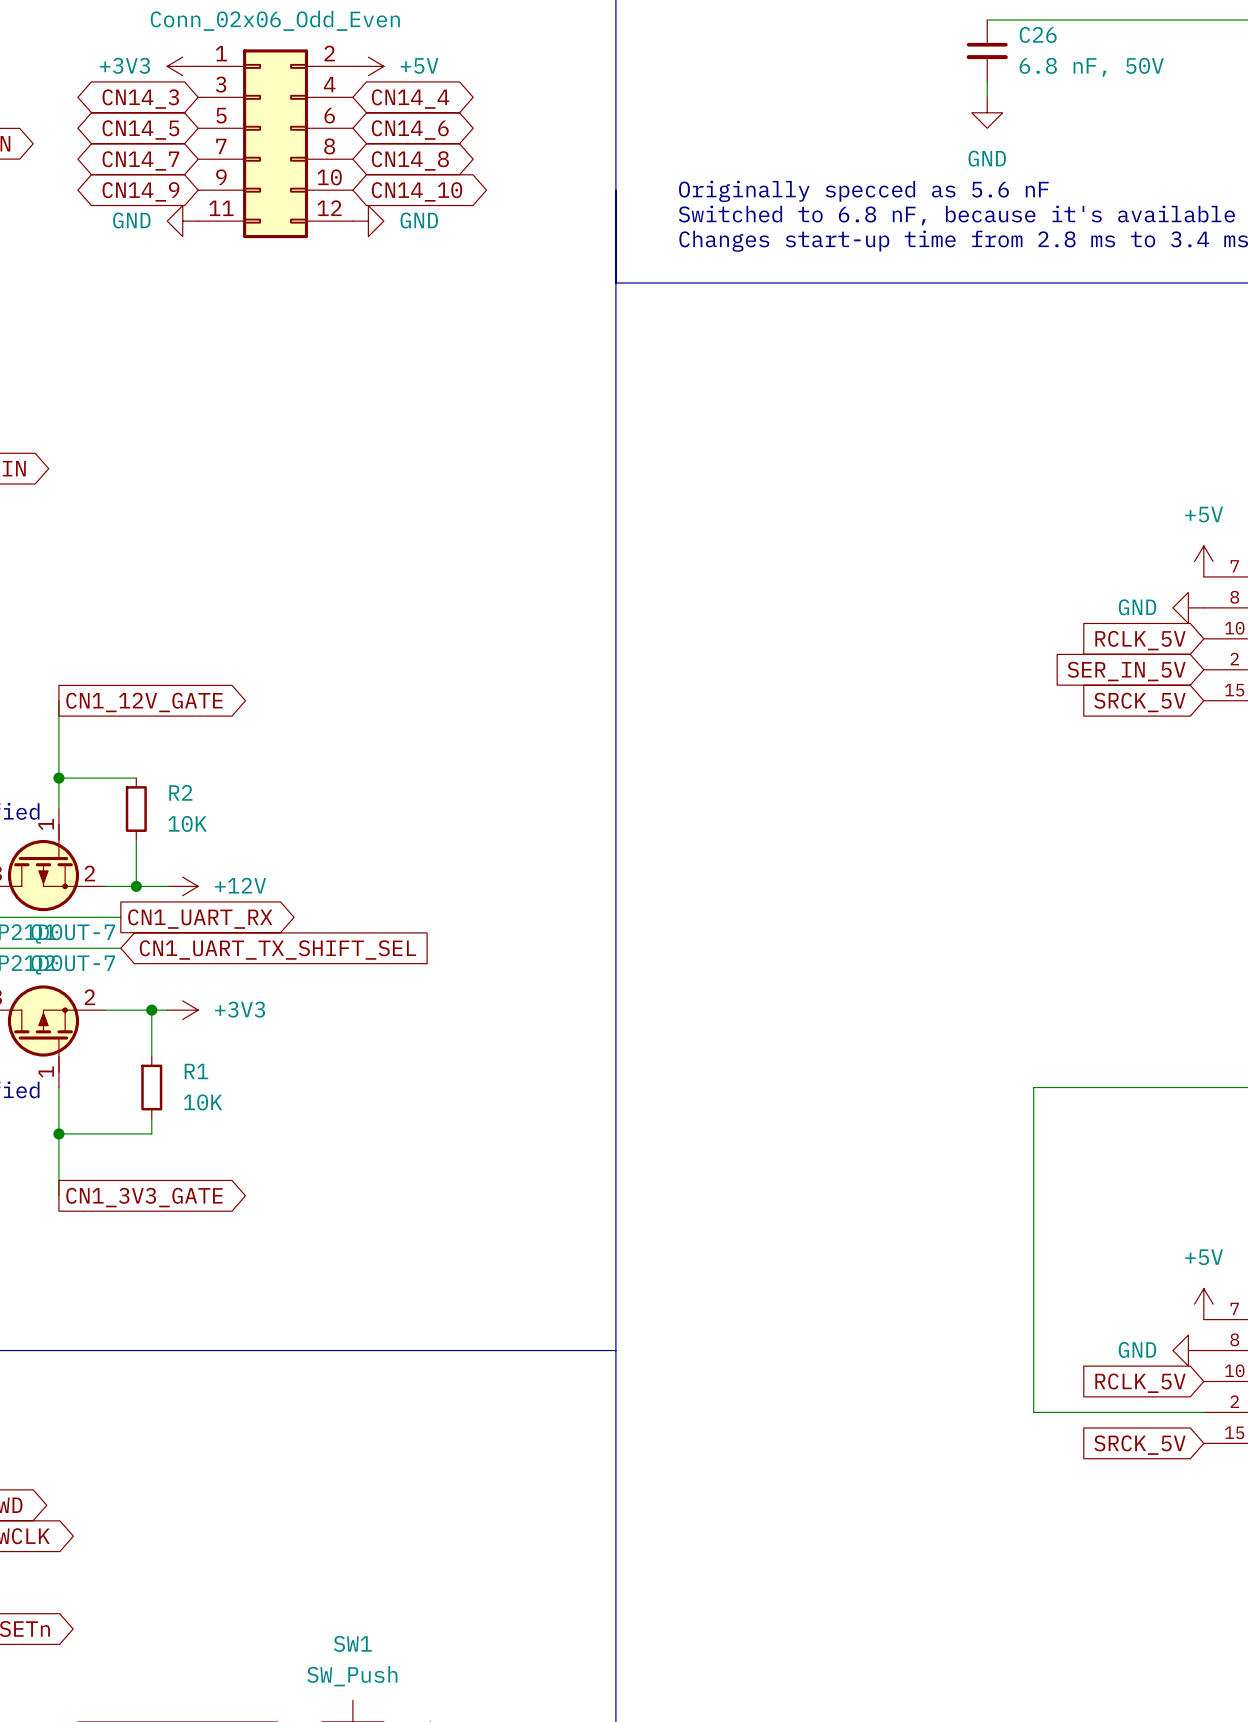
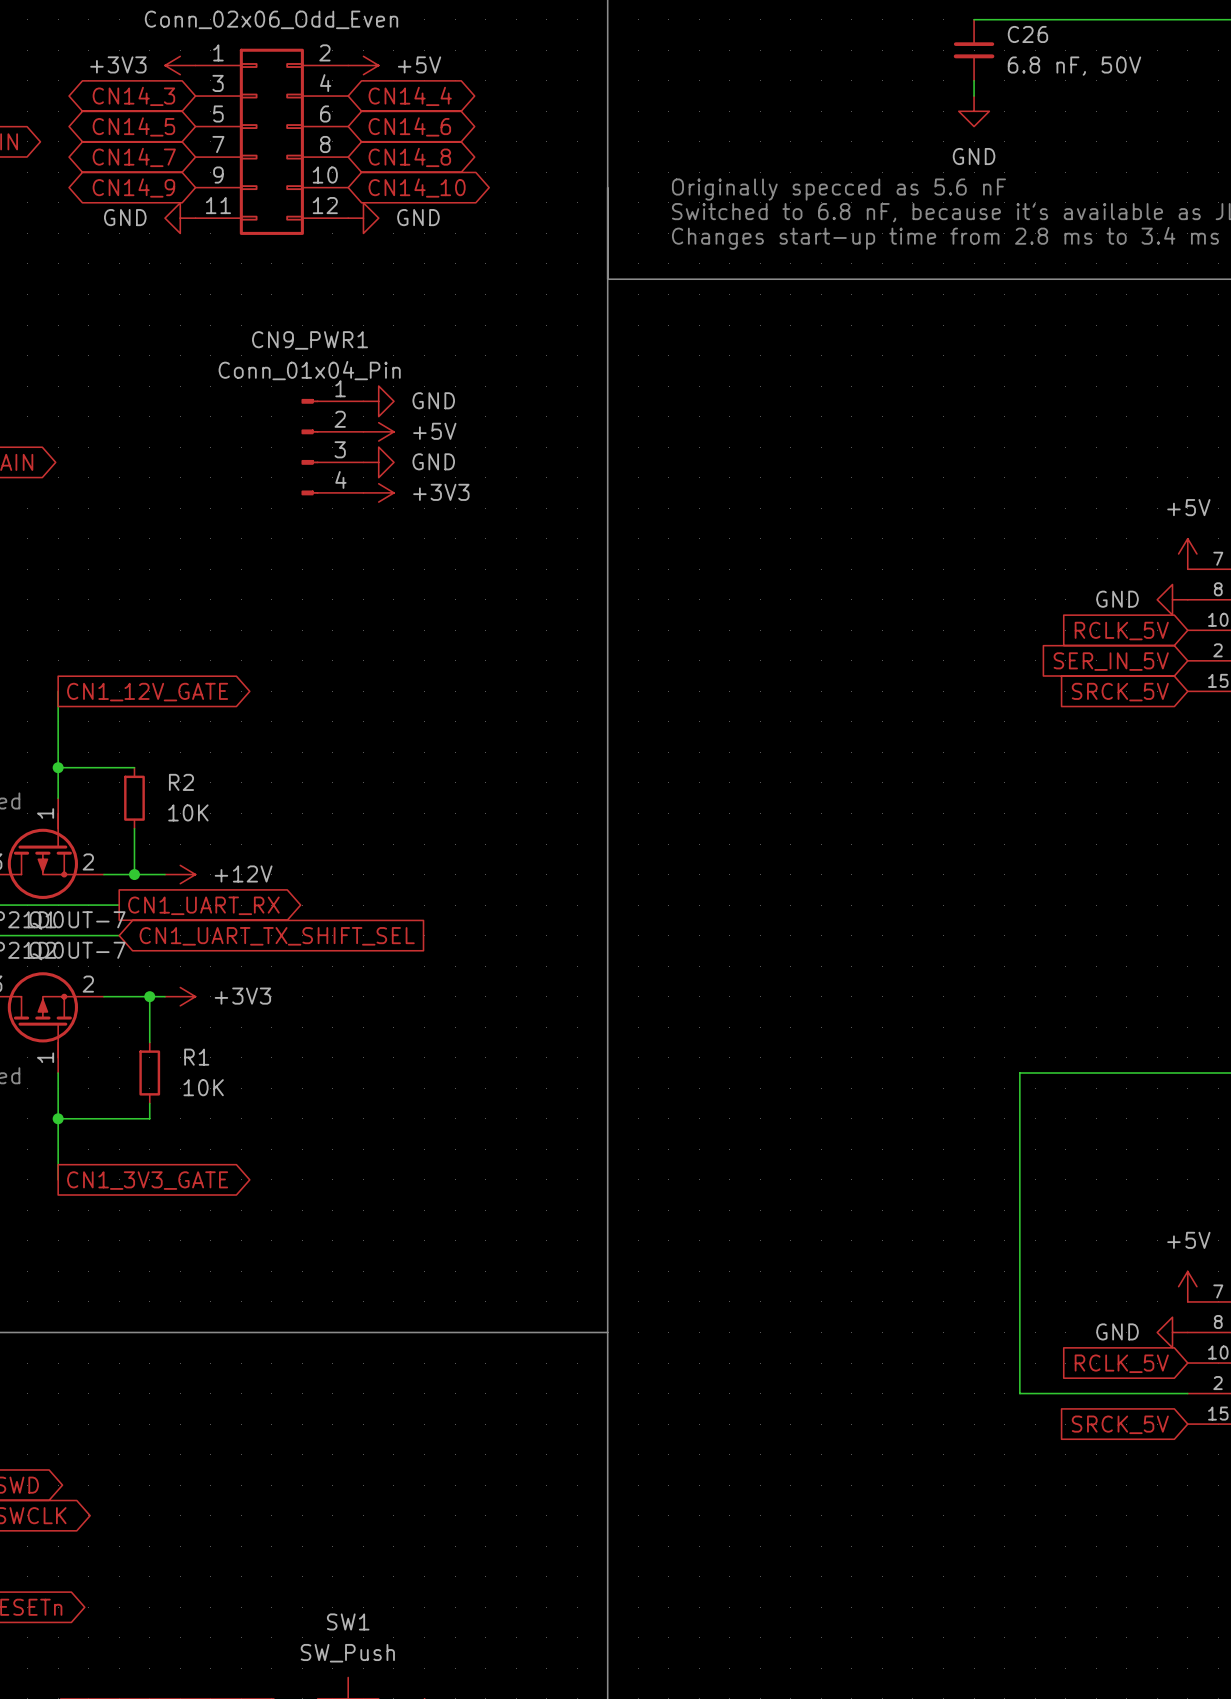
power symbol: none -> GND (378, 401)
power symbol: none -> +5V (378, 431)
CN9_PWR1: none -> Conn_01x04_Pin (332, 447)
power symbol: none -> GND (378, 462)
power symbol: none -> +3V3 (378, 492)

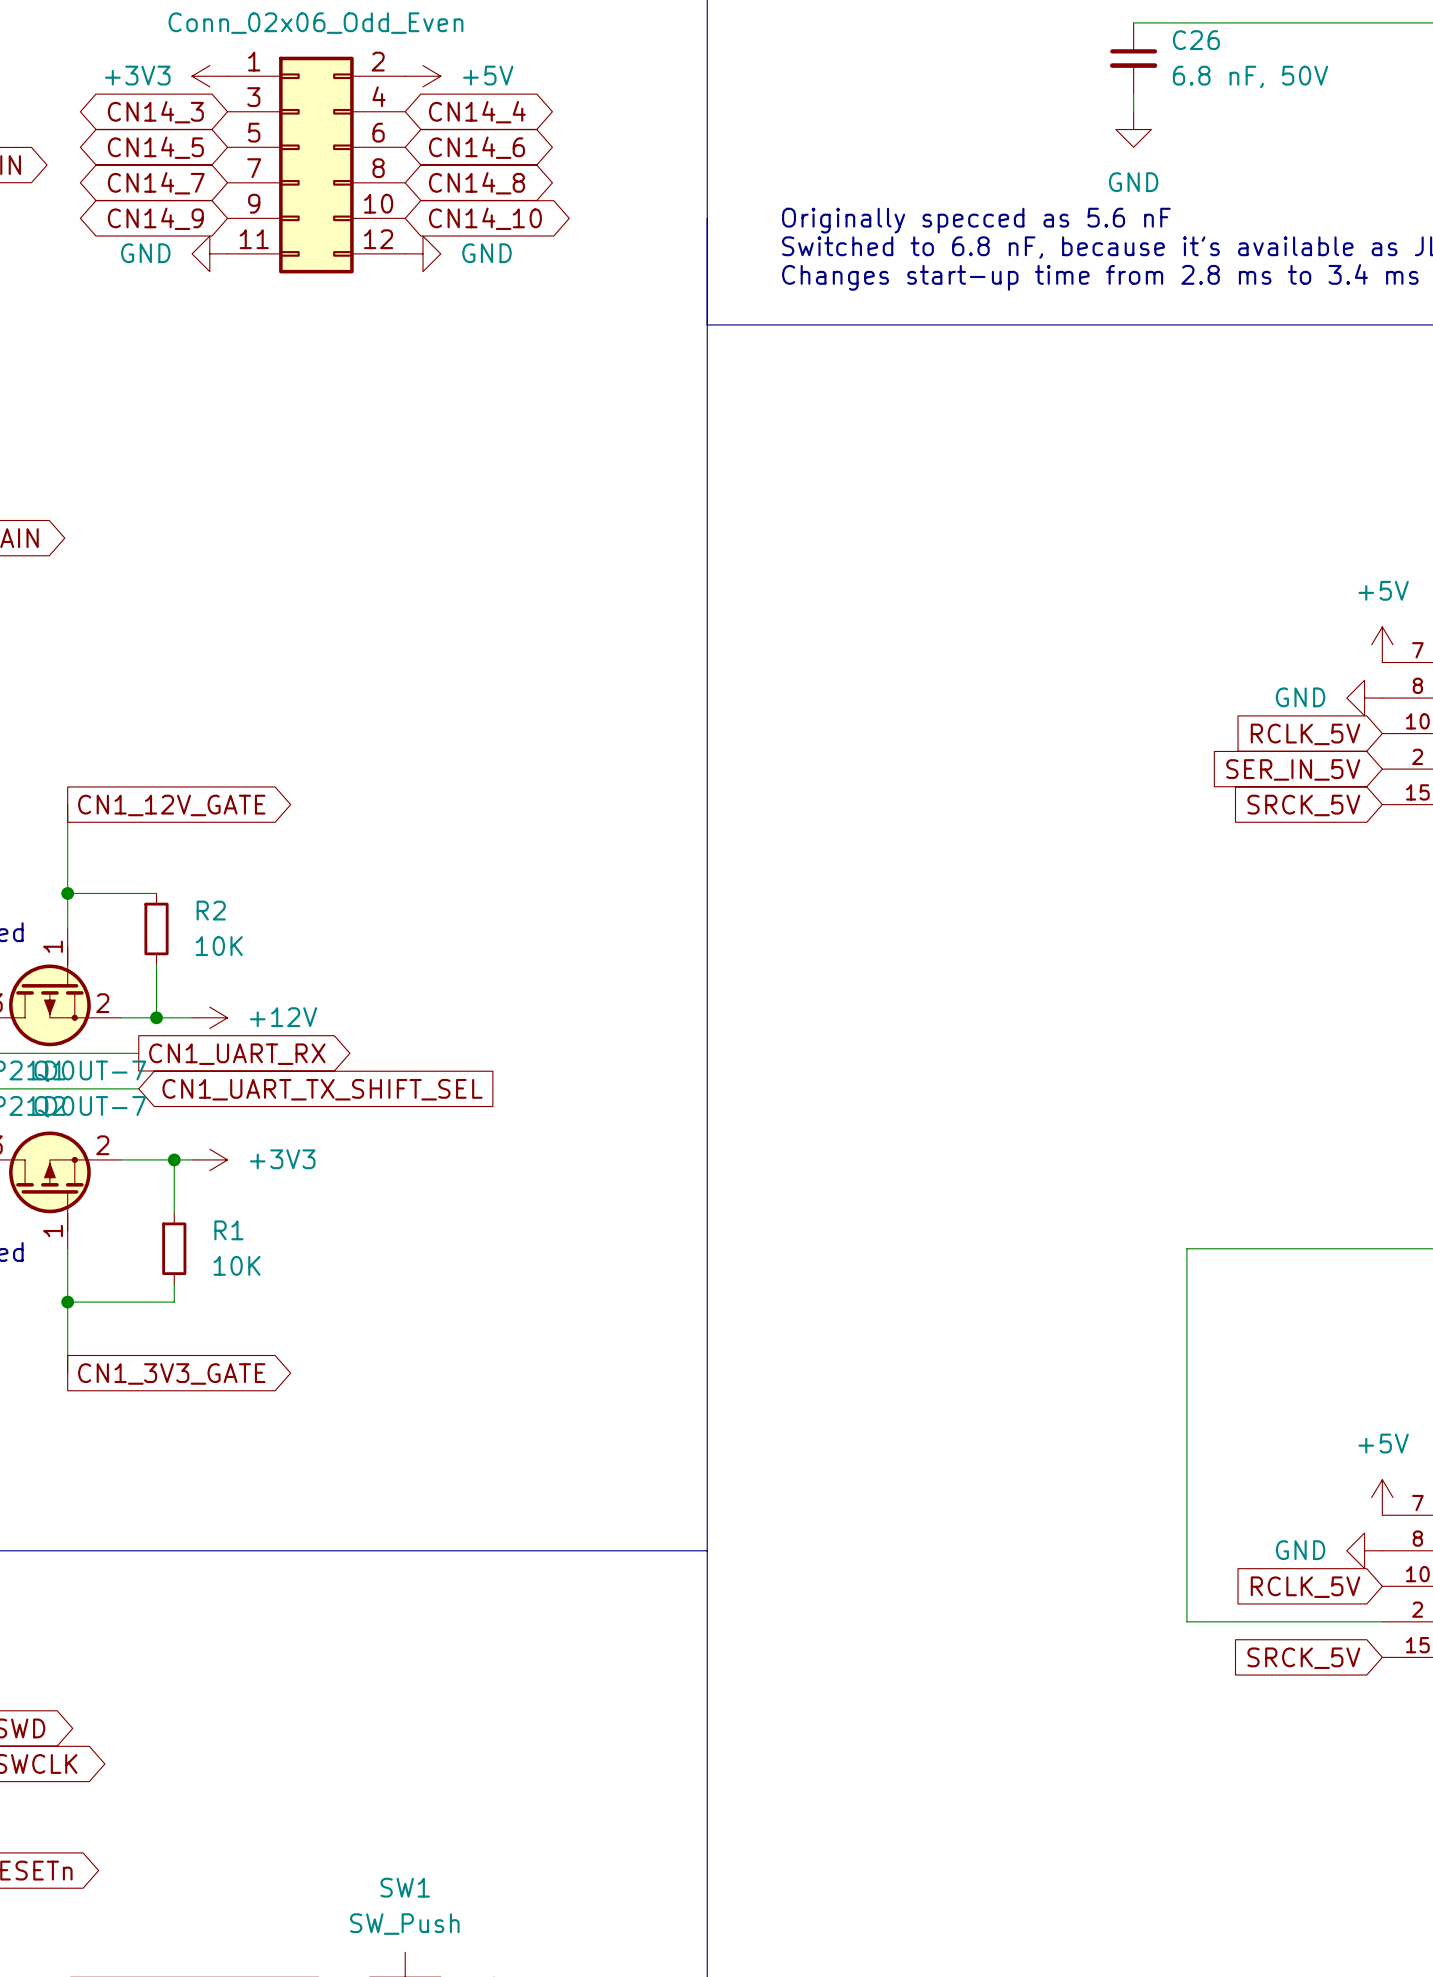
power symbol: GND (378, 401) -> none
power symbol: +5V (378, 431) -> none
CN9_PWR1: Conn_01x04_Pin (332, 447) -> none
power symbol: GND (378, 462) -> none
power symbol: +3V3 (378, 492) -> none

